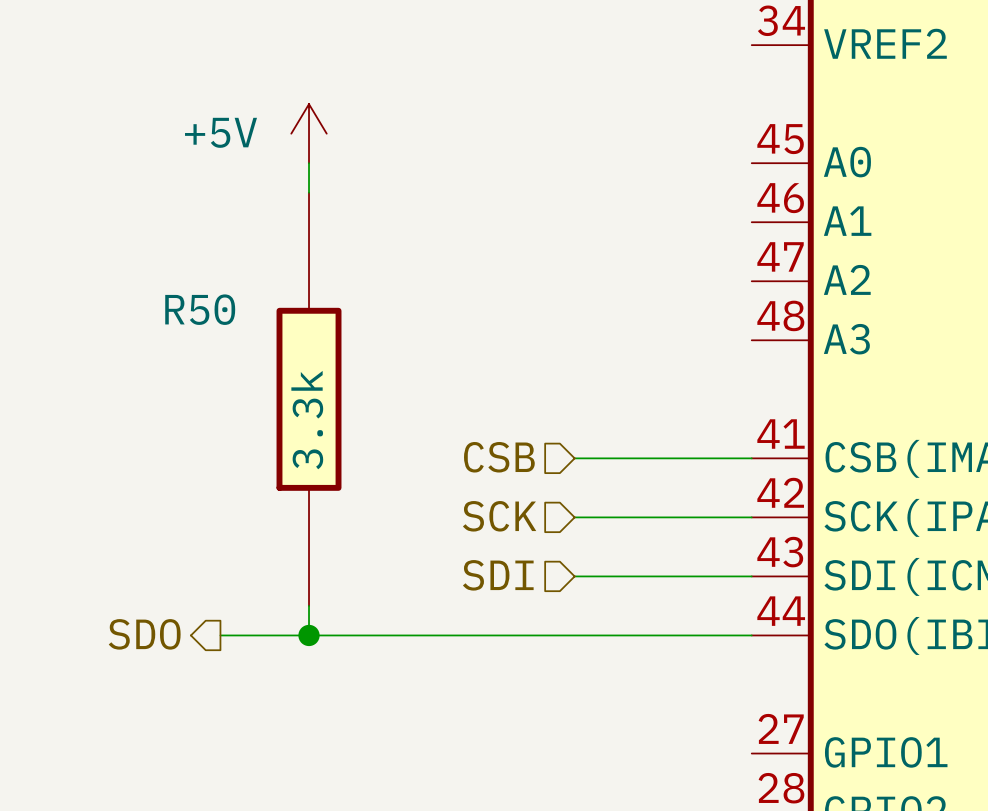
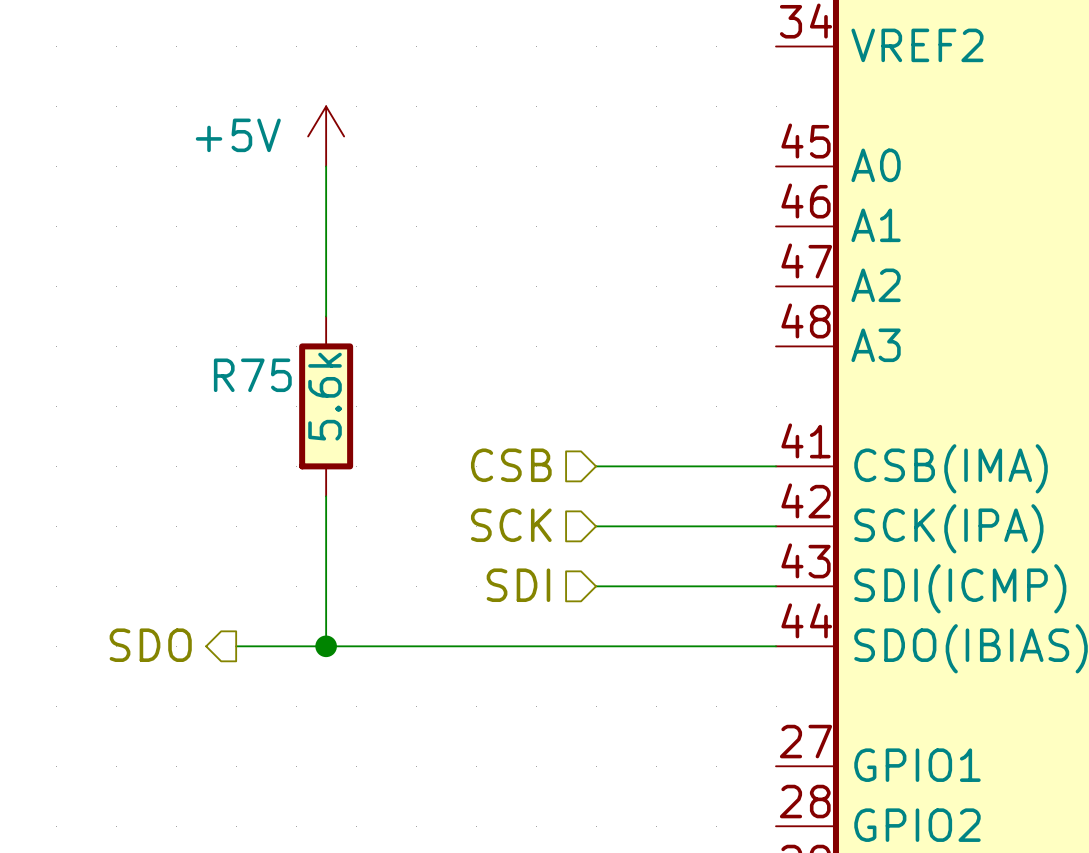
R50: 3.3k (309, 399) -> none
R75: none -> 5.6k (326, 406)

